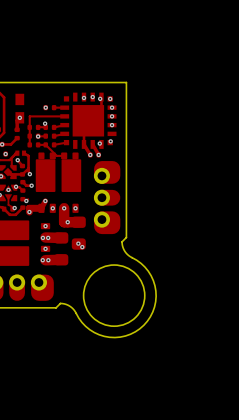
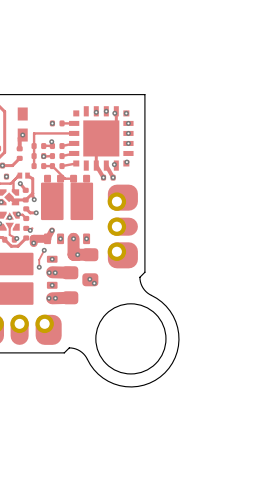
track: none -> (44, 250) (39, 259) (39, 267)
via: none -> (44, 250)
via: none -> (39, 267)

